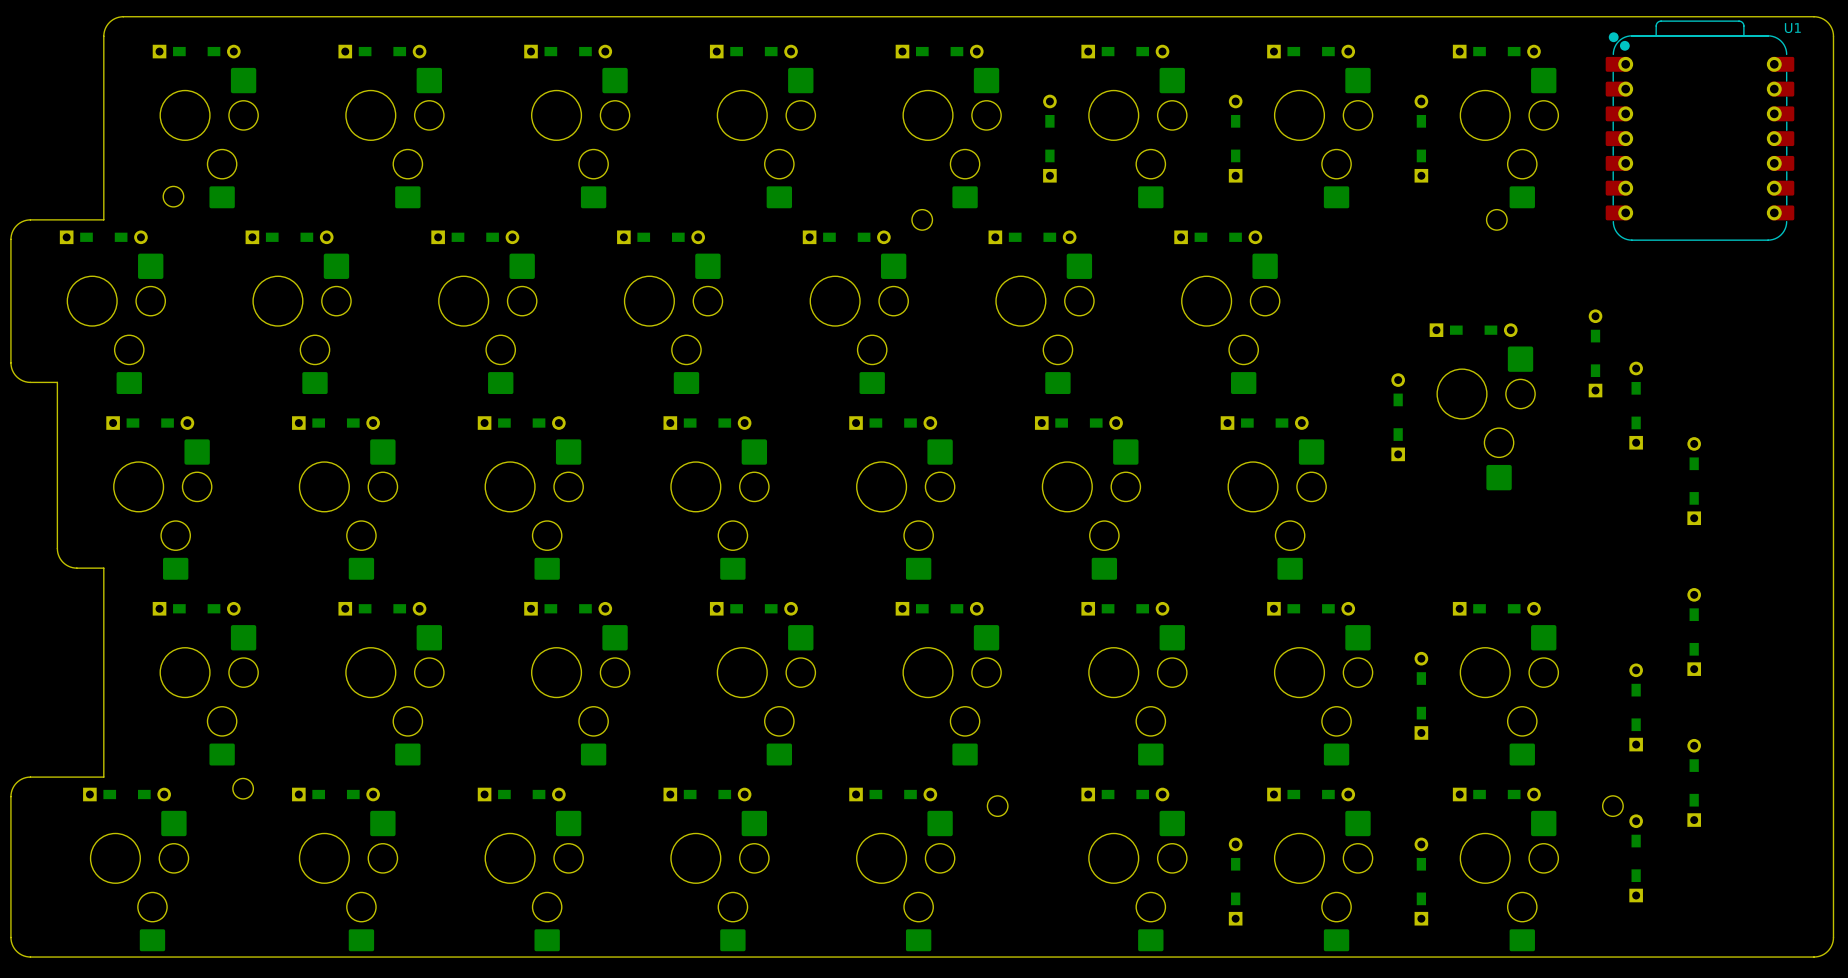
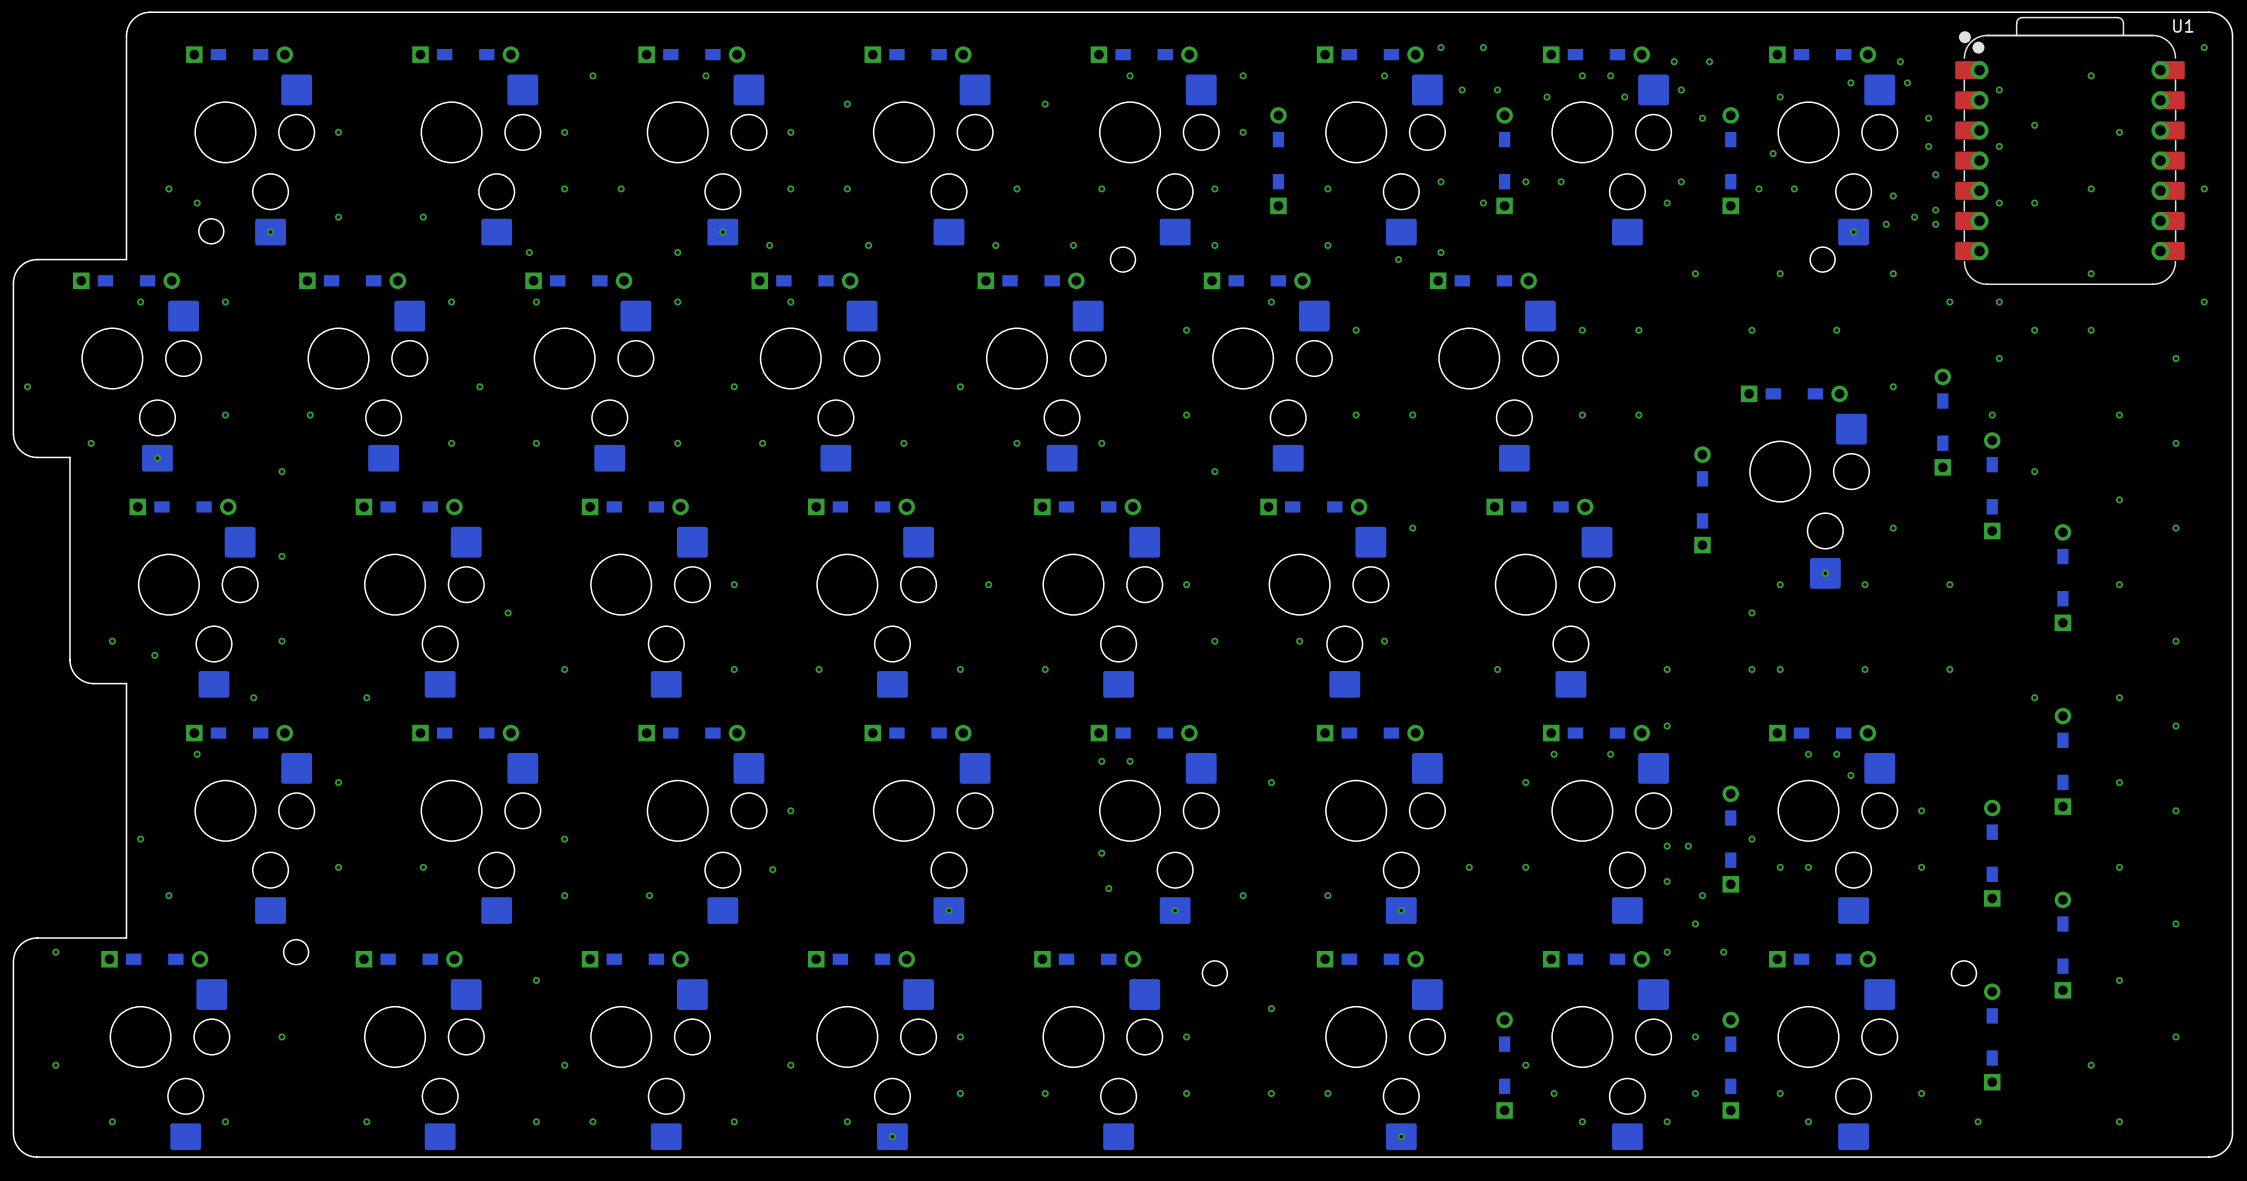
via: none -> (1441, 47)
via: none -> (1483, 47)
via: none -> (2204, 47)
via: none -> (1674, 61)
via: none -> (1709, 61)
via: none -> (1900, 61)
via: none -> (592, 75)
via: none -> (706, 75)
via: none -> (1130, 75)
via: none -> (1243, 75)
via: none -> (1384, 75)
via: none -> (1582, 75)
via: none -> (1610, 75)
via: none -> (2091, 75)
via: none -> (1850, 82)
via: none -> (1907, 82)
via: none -> (1462, 89)
via: none -> (1497, 89)
via: none -> (1681, 89)
via: none -> (1999, 89)
via: none -> (1547, 97)
via: none -> (1624, 97)
via: none -> (1780, 97)
via: none -> (847, 104)
via: none -> (1045, 104)
via: none -> (1702, 118)
via: none -> (1928, 118)
via: none -> (2034, 125)
via: none -> (338, 132)
via: none -> (564, 132)
via: none -> (790, 132)
via: none -> (1243, 132)
via: none -> (2119, 132)
via: none -> (1928, 146)
via: none -> (1999, 146)
via: none -> (1773, 153)
via: none -> (1935, 174)
via: none -> (1441, 181)
via: none -> (1525, 181)
via: none -> (1561, 181)
via: none -> (1681, 181)
via: none -> (168, 188)
via: none -> (564, 188)
via: none -> (621, 188)
via: none -> (790, 188)
via: none -> (847, 188)
via: none -> (1016, 188)
via: none -> (1101, 188)
via: none -> (1214, 188)
via: none -> (1327, 188)
via: none -> (1759, 188)
via: none -> (1794, 188)
via: none -> (2091, 188)
via: none -> (2204, 188)
via: none -> (1893, 195)
via: none -> (197, 203)
via: none -> (1483, 203)
via: none -> (1667, 203)
via: none -> (1999, 203)
via: none -> (2034, 203)
via: none -> (1935, 210)
via: none -> (338, 217)
via: none -> (423, 217)
via: none -> (1914, 217)
via: none -> (1886, 224)
via: none -> (1935, 224)
via: none -> (270, 232)
via: none -> (722, 232)
via: none -> (1853, 232)
via: none -> (769, 245)
via: none -> (868, 245)
via: none -> (995, 245)
via: none -> (1073, 245)
via: none -> (1214, 245)
via: none -> (1327, 245)
via: none -> (529, 252)
via: none -> (677, 252)
via: none -> (1441, 252)
via: none -> (1398, 259)
via: none -> (1695, 273)
via: none -> (1780, 273)
via: none -> (1893, 273)
via: none -> (2091, 273)
via: none -> (140, 301)
via: none -> (225, 301)
via: none -> (451, 301)
via: none -> (536, 301)
via: none -> (677, 301)
via: none -> (790, 301)
via: none -> (1271, 301)
via: none -> (1949, 301)
via: none -> (1999, 301)
via: none -> (2204, 301)
via: none -> (1186, 330)
via: none -> (1356, 330)
via: none -> (1582, 330)
via: none -> (1638, 330)
via: none -> (1751, 330)
via: none -> (1836, 330)
via: none -> (2034, 330)
via: none -> (2091, 330)
via: none -> (1999, 358)
via: none -> (2175, 358)
via: none -> (27, 386)
via: none -> (479, 386)
via: none -> (734, 386)
via: none -> (960, 386)
via: none -> (1893, 386)
via: none -> (225, 415)
via: none -> (310, 415)
via: none -> (1186, 415)
via: none -> (1356, 415)
via: none -> (1412, 415)
via: none -> (1582, 415)
via: none -> (1638, 415)
via: none -> (1992, 415)
via: none -> (2119, 415)
via: none -> (91, 443)
via: none -> (451, 443)
via: none -> (536, 443)
via: none -> (677, 443)
via: none -> (762, 443)
via: none -> (903, 443)
via: none -> (1016, 443)
via: none -> (1101, 443)
via: none -> (2175, 443)
via: none -> (157, 458)
via: none -> (281, 471)
via: none -> (1214, 471)
via: none -> (2034, 471)
via: none -> (2119, 499)
via: none -> (1412, 528)
via: none -> (1893, 528)
via: none -> (2175, 528)
via: none -> (281, 556)
via: none -> (1825, 573)
via: none -> (734, 584)
via: none -> (988, 584)
via: none -> (1186, 584)
via: none -> (1780, 584)
via: none -> (1865, 584)
via: none -> (1949, 584)
via: none -> (2119, 584)
via: none -> (508, 612)
via: none -> (1751, 612)
via: none -> (112, 641)
via: none -> (281, 641)
via: none -> (1214, 641)
via: none -> (1299, 641)
via: none -> (1384, 641)
via: none -> (2175, 641)
via: none -> (154, 655)
via: none -> (564, 669)
via: none -> (734, 669)
via: none -> (819, 669)
via: none -> (960, 669)
via: none -> (1045, 669)
via: none -> (1497, 669)
via: none -> (1667, 669)
via: none -> (1751, 669)
via: none -> (1780, 669)
via: none -> (1865, 669)
via: none -> (1949, 669)
via: none -> (253, 697)
via: none -> (366, 697)
via: none -> (2034, 697)
via: none -> (2119, 697)
via: none -> (1667, 726)
via: none -> (2175, 726)
via: none -> (197, 754)
via: none -> (1554, 754)
via: none -> (1610, 754)
via: none -> (1808, 754)
via: none -> (1836, 754)
via: none -> (1101, 761)
via: none -> (1130, 761)
via: none -> (1850, 775)
via: none -> (338, 782)
via: none -> (1271, 782)
via: none -> (1525, 782)
via: none -> (2119, 782)
via: none -> (790, 810)
via: none -> (1921, 810)
via: none -> (2175, 810)
via: none -> (140, 839)
via: none -> (564, 839)
via: none -> (1751, 839)
via: none -> (1667, 846)
via: none -> (1688, 846)
via: none -> (1101, 853)
via: none -> (338, 867)
via: none -> (423, 867)
via: none -> (1469, 867)
via: none -> (1525, 867)
via: none -> (1780, 867)
via: none -> (1808, 867)
via: none -> (1921, 867)
via: none -> (2119, 867)
via: none -> (772, 869)
via: none -> (1667, 881)
via: none -> (1108, 888)
via: none -> (168, 895)
via: none -> (564, 895)
via: none -> (649, 895)
via: none -> (1243, 895)
via: none -> (1327, 895)
via: none -> (1702, 895)
via: none -> (949, 910)
via: none -> (1175, 910)
via: none -> (1401, 910)
via: none -> (1695, 923)
via: none -> (2175, 923)
via: none -> (55, 952)
via: none -> (1667, 952)
via: none -> (1723, 952)
via: none -> (536, 980)
via: none -> (2119, 980)
via: none -> (1271, 1008)
via: none -> (281, 1036)
via: none -> (960, 1036)
via: none -> (1186, 1036)
via: none -> (1695, 1036)
via: none -> (2175, 1036)
via: none -> (55, 1065)
via: none -> (564, 1065)
via: none -> (790, 1065)
via: none -> (1525, 1065)
via: none -> (2091, 1065)
via: none -> (960, 1093)
via: none -> (1045, 1093)
via: none -> (1186, 1093)
via: none -> (1271, 1093)
via: none -> (1327, 1093)
via: none -> (1554, 1093)
via: none -> (1695, 1093)
via: none -> (1780, 1093)
via: none -> (1921, 1093)
via: none -> (112, 1121)
via: none -> (225, 1121)
via: none -> (366, 1121)
via: none -> (536, 1121)
via: none -> (592, 1121)
via: none -> (734, 1121)
via: none -> (847, 1121)
via: none -> (1582, 1121)
via: none -> (1667, 1121)
via: none -> (1808, 1121)
via: none -> (1978, 1121)
via: none -> (2119, 1121)
via: none -> (892, 1136)
via: none -> (1401, 1136)

